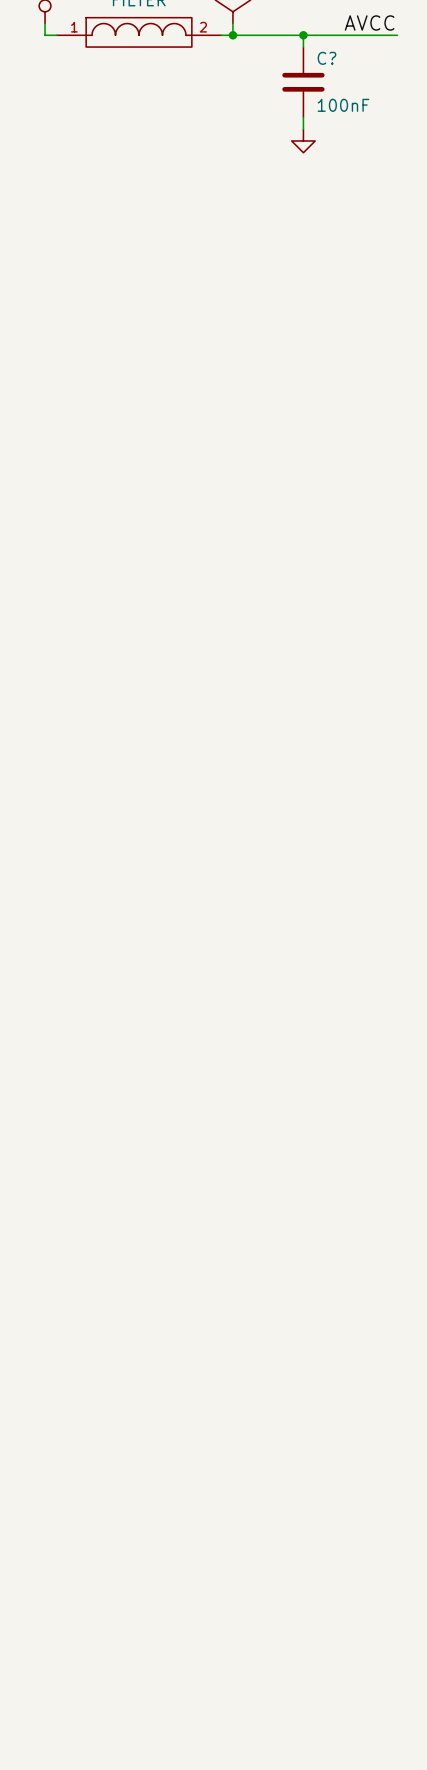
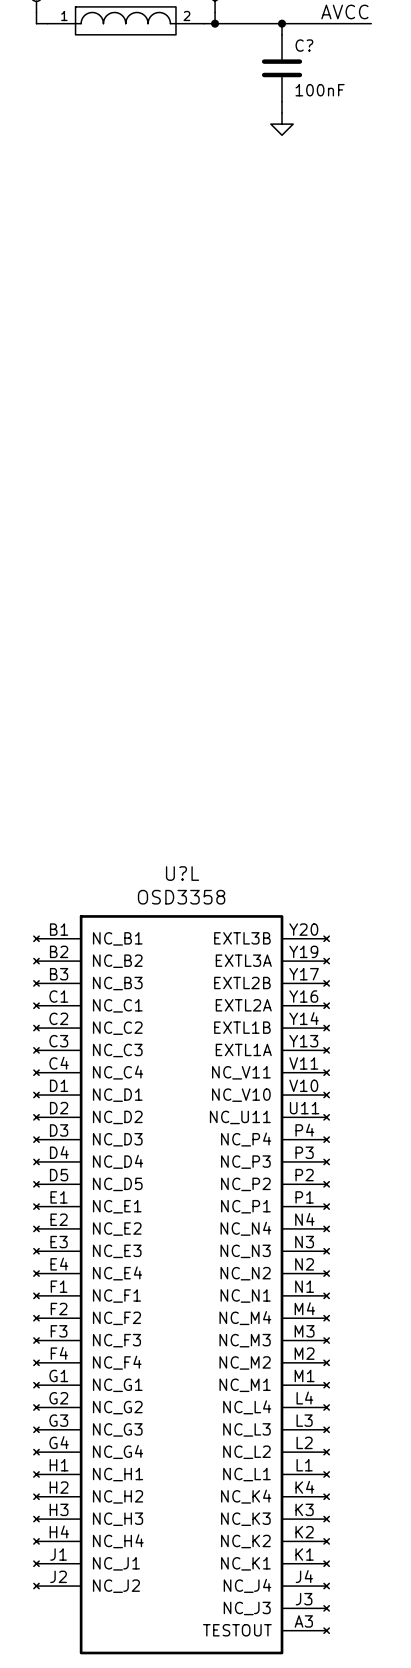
U?L: none -> OSD3358 (181, 1284)

